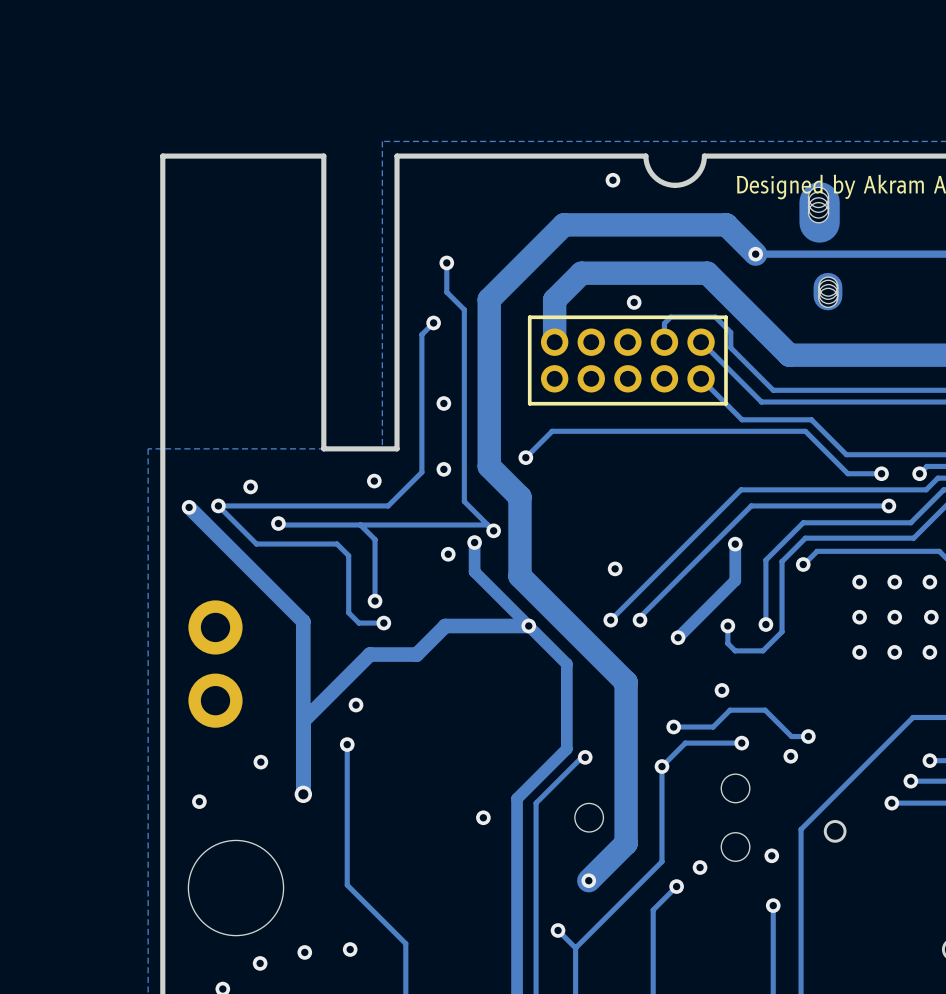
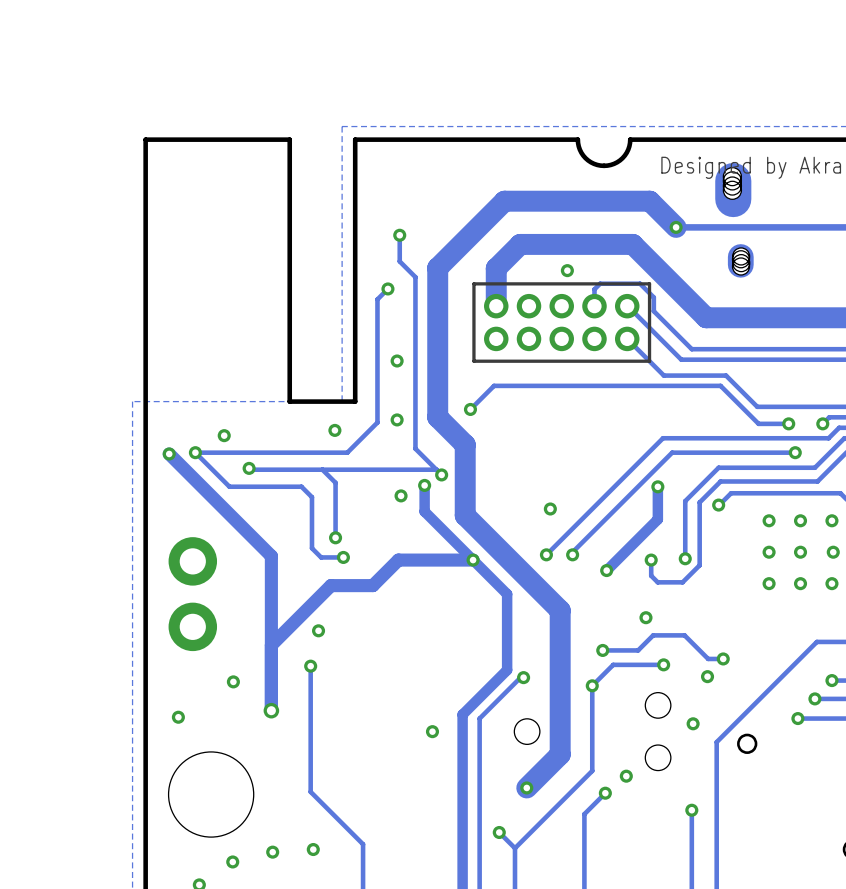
via: (612, 180) -> none
via position: (771, 855) -> (693, 723)

